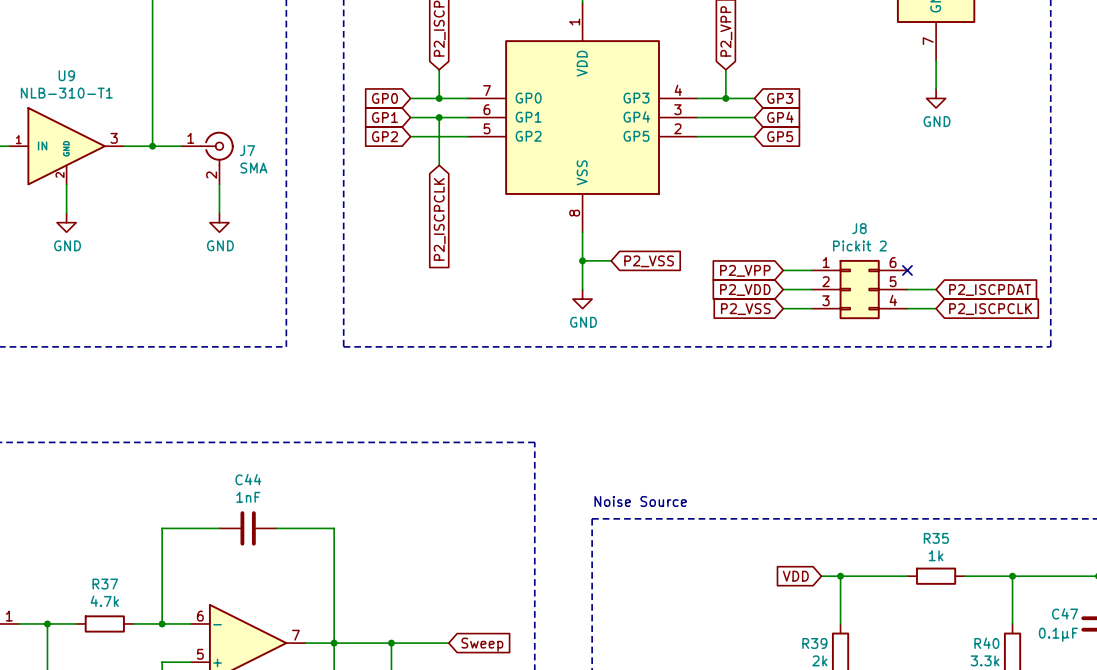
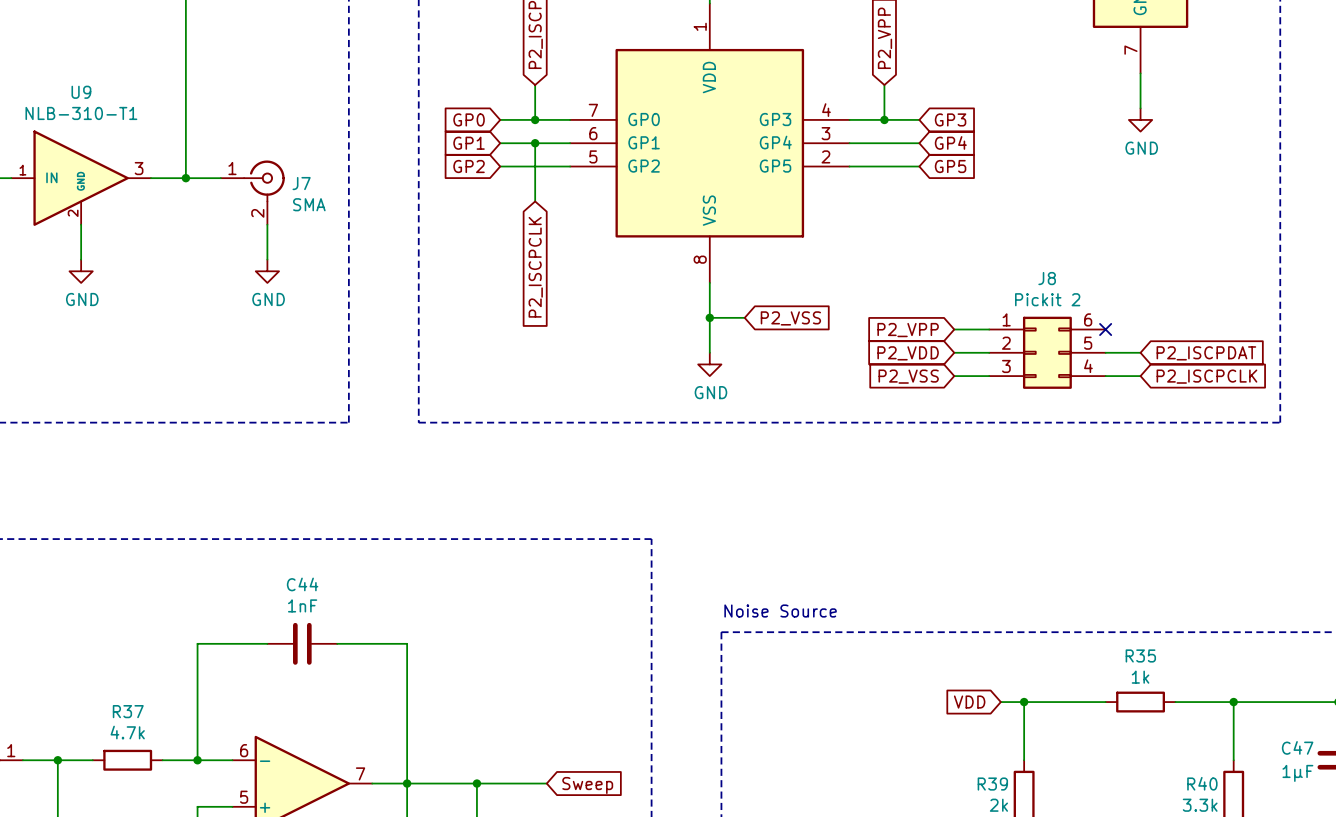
C47 value: 0.1μF (1058, 634) -> 1μF (1297, 773)

